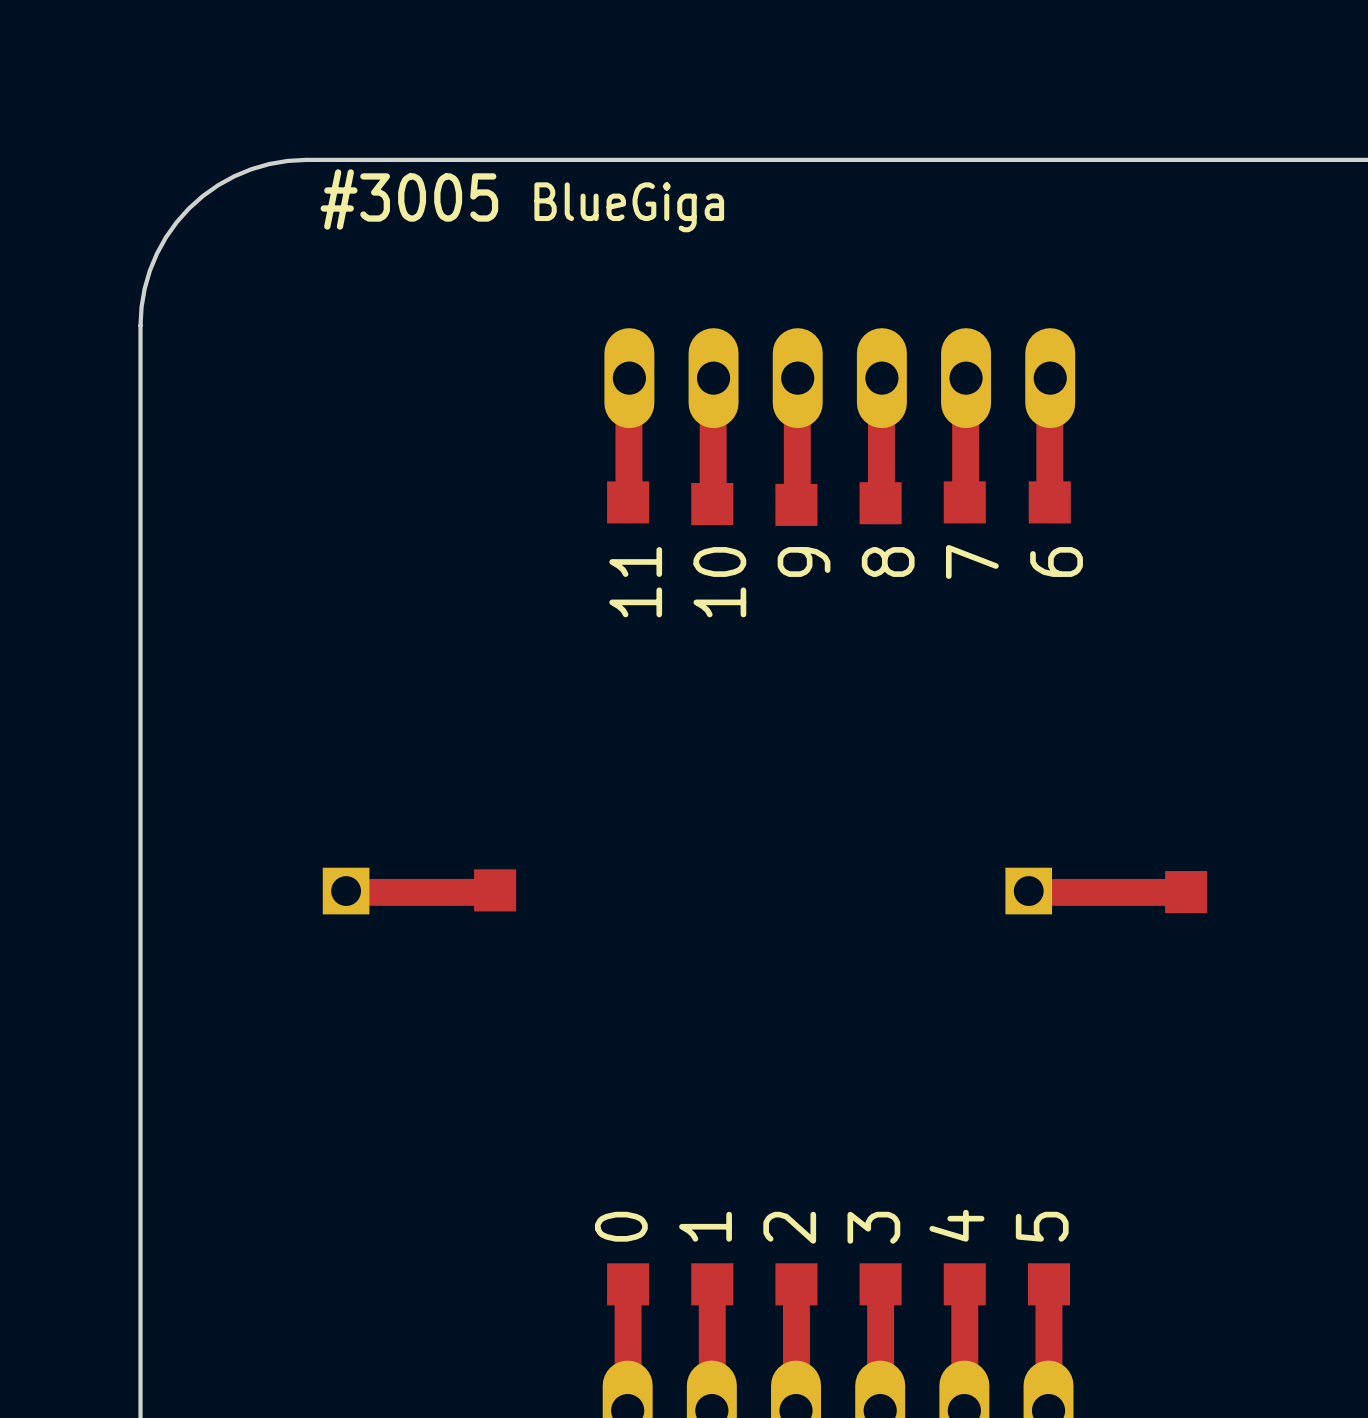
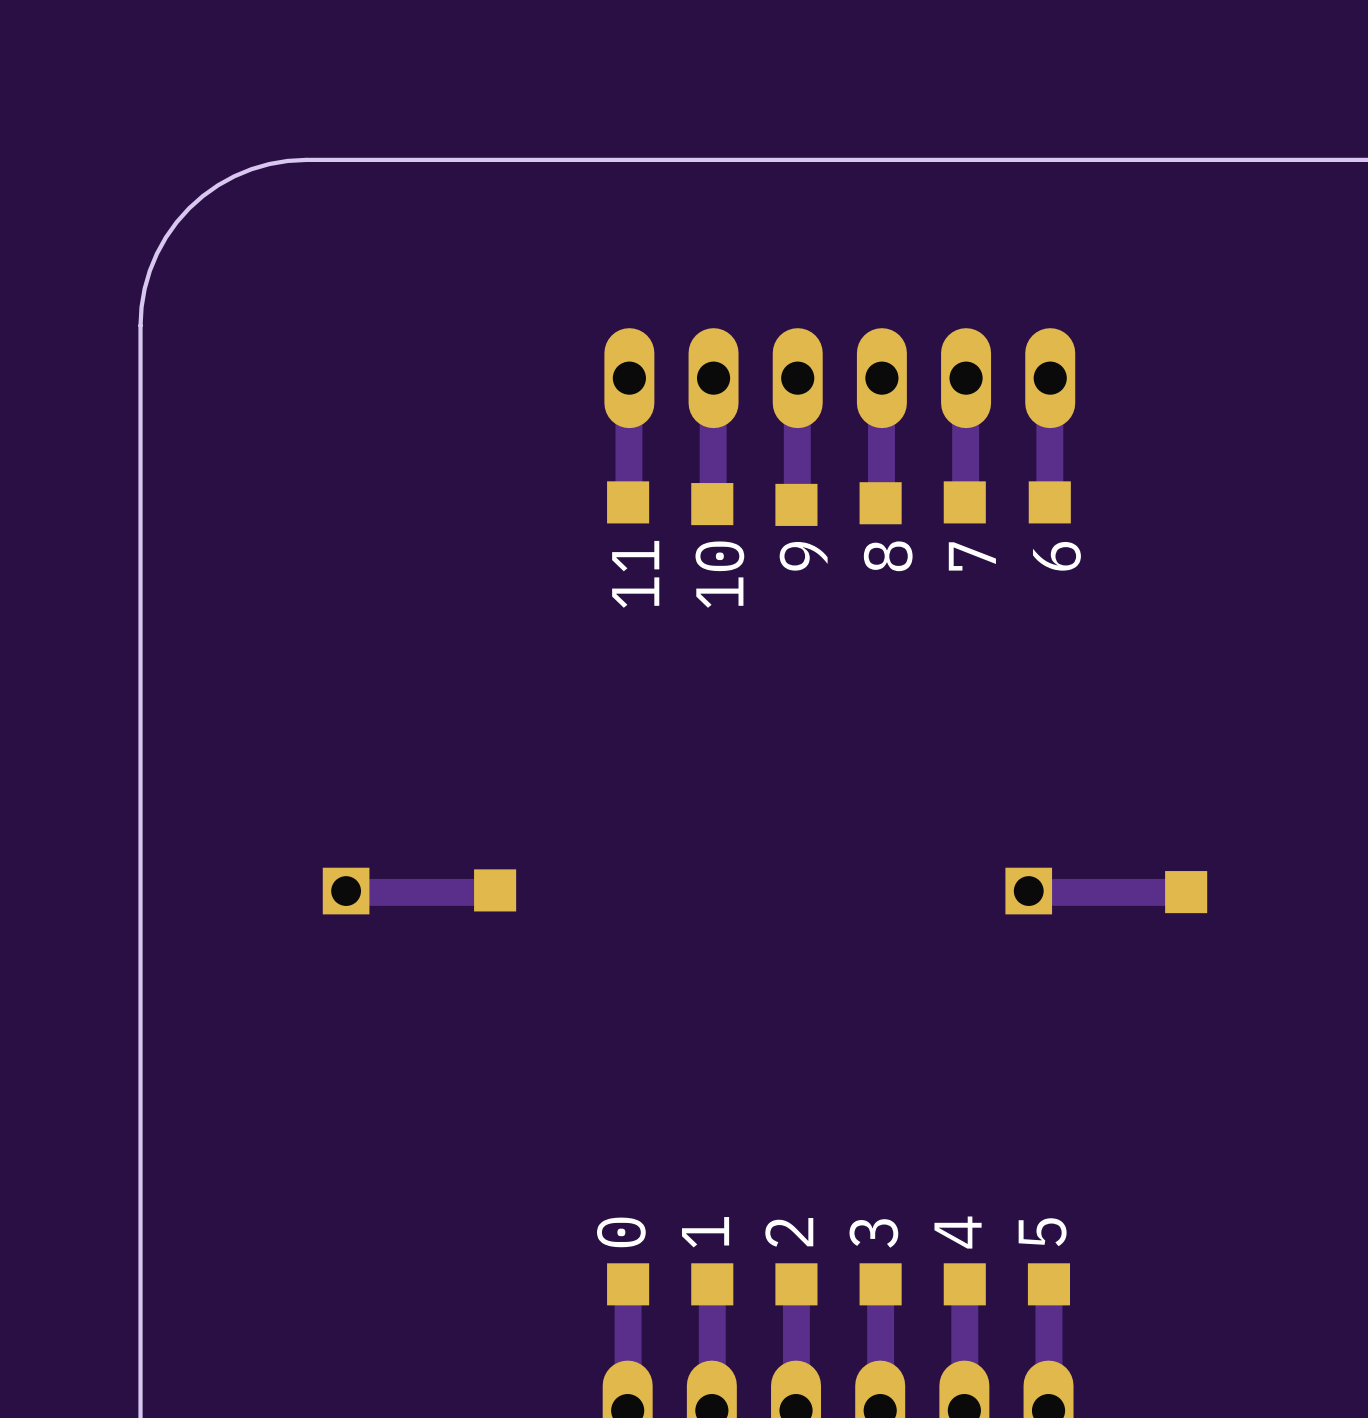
text: #3005 (409, 199) -> none
text: BlueGiga (629, 207) -> none

